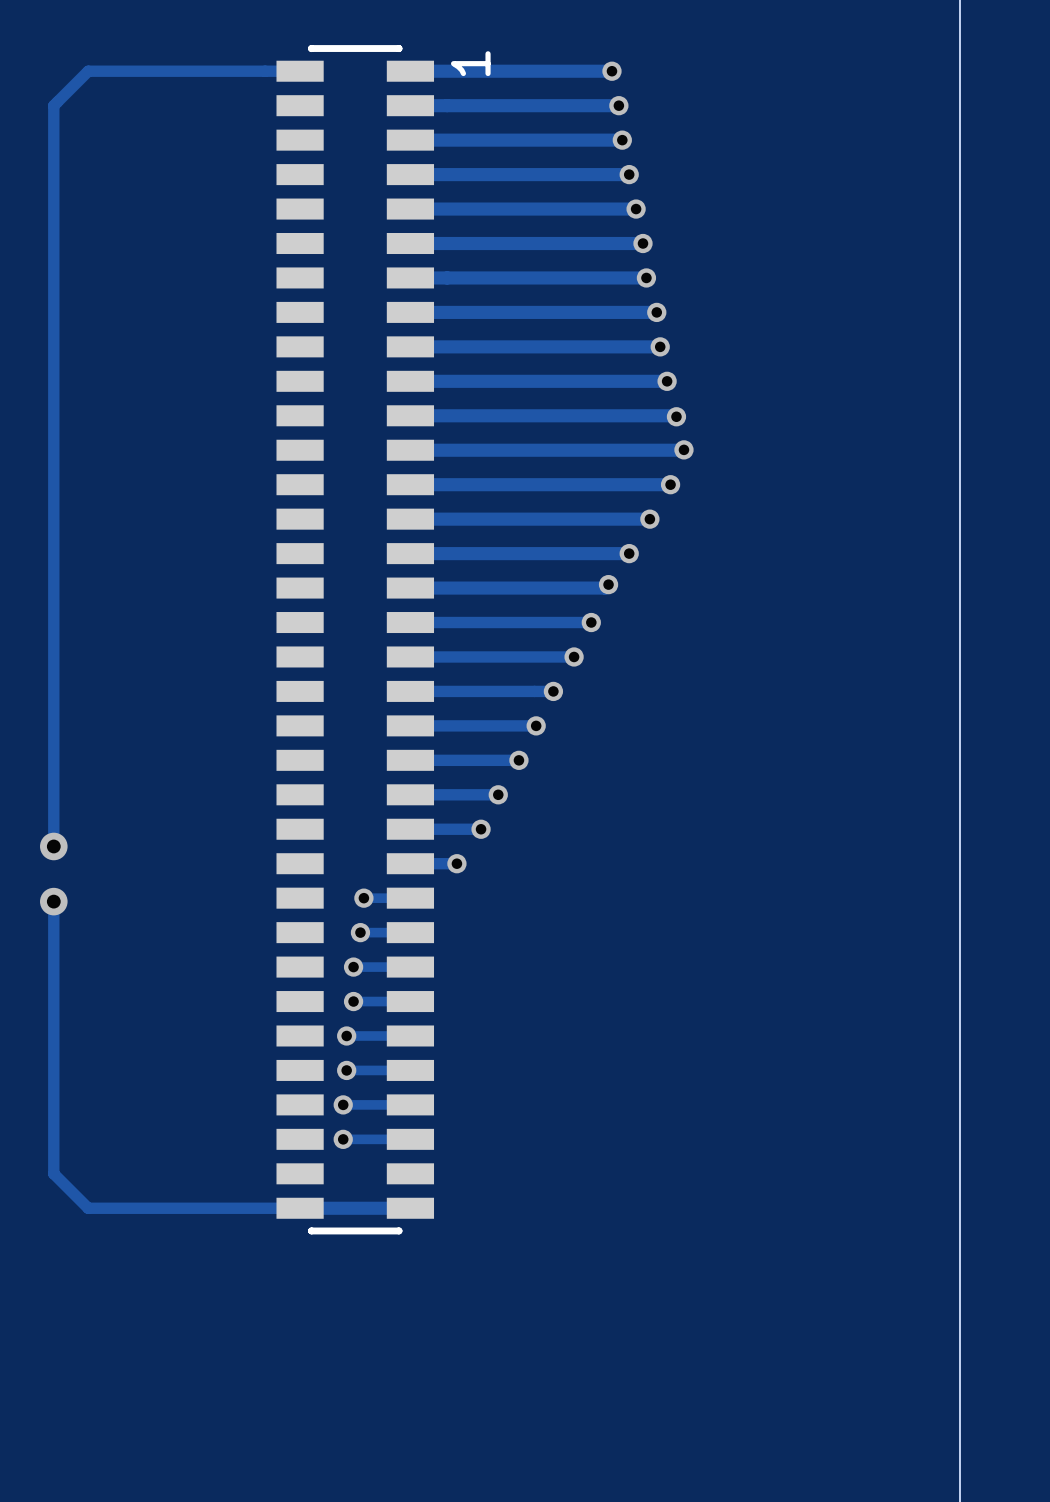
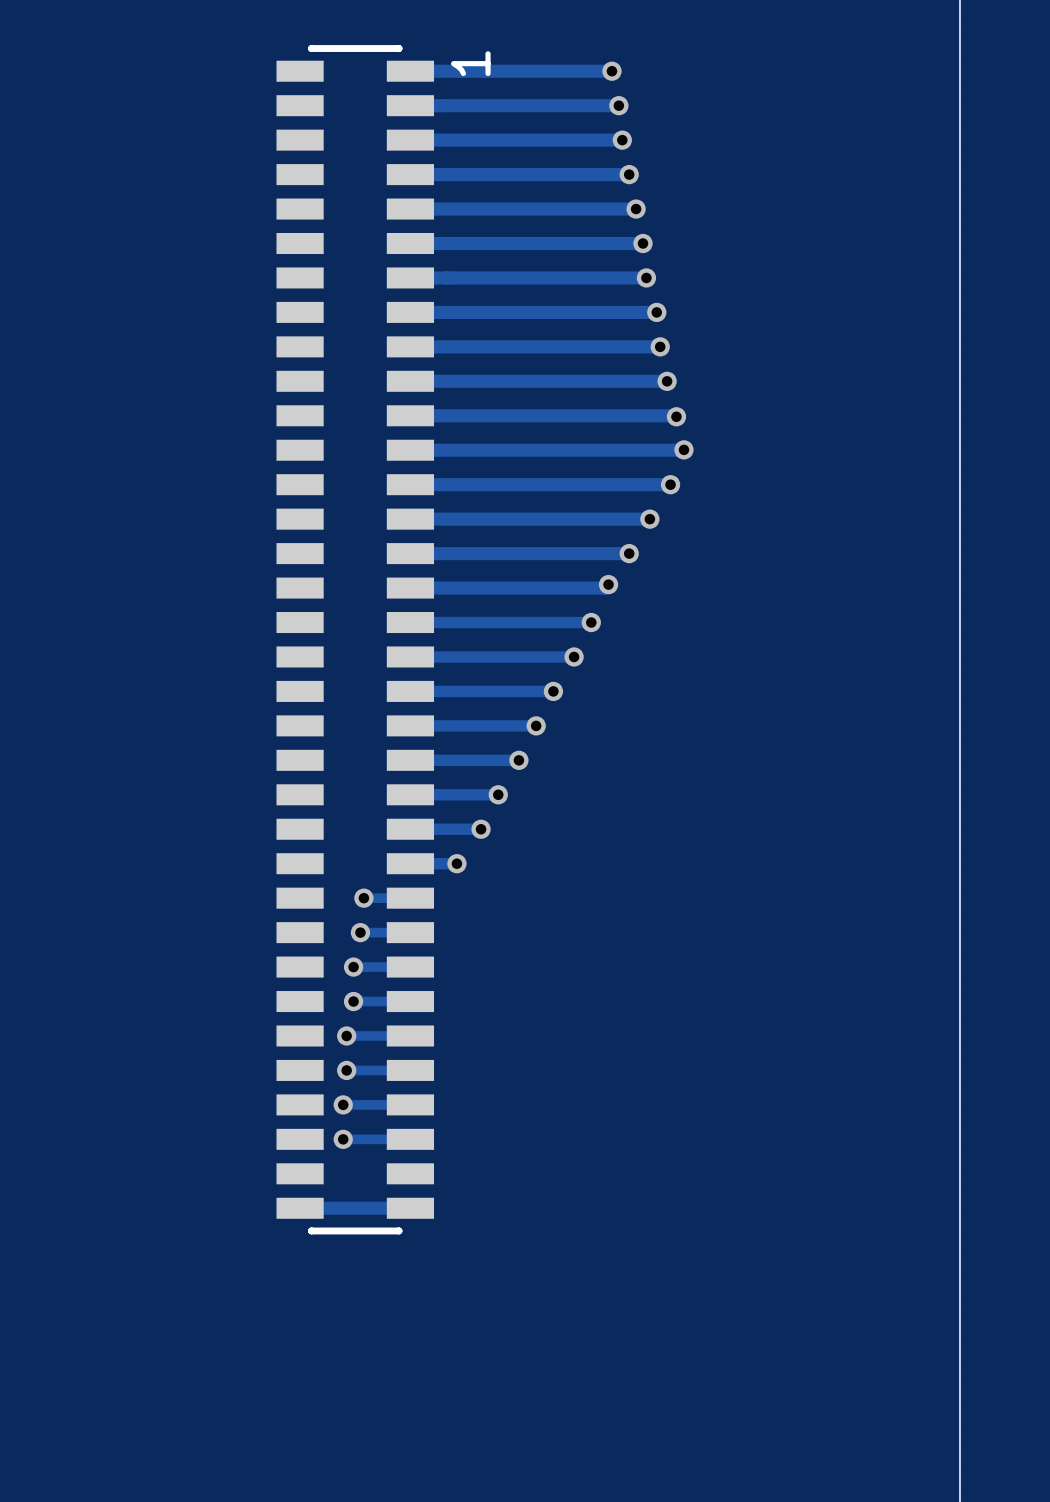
track: (300, 71) (88, 71) (53, 105) (53, 846) -> none
via: (53, 846) -> none
track: (53, 901) (53, 1173) (88, 1208) (300, 1208) -> none
via: (53, 901) -> none

